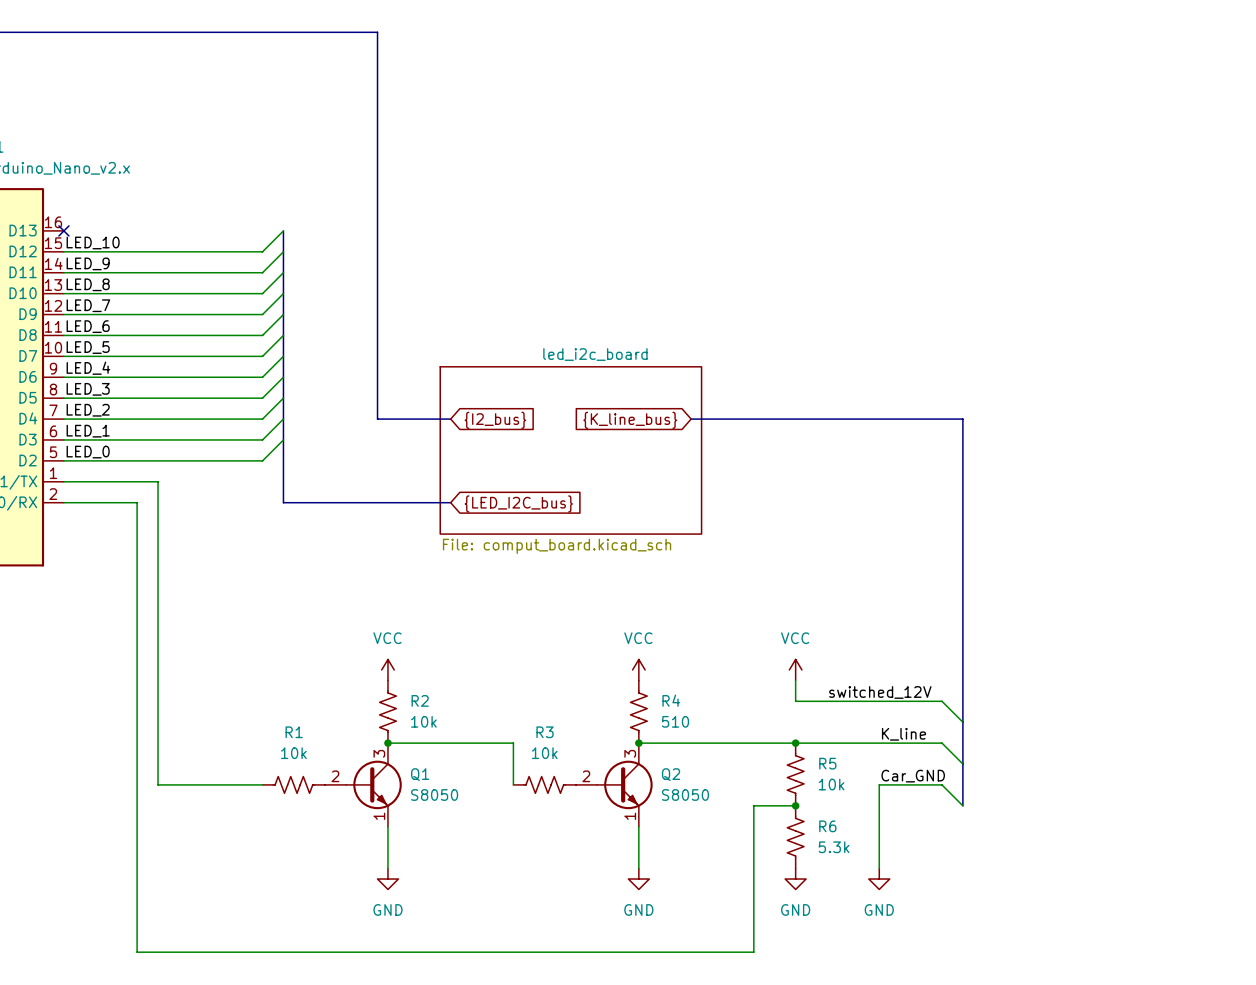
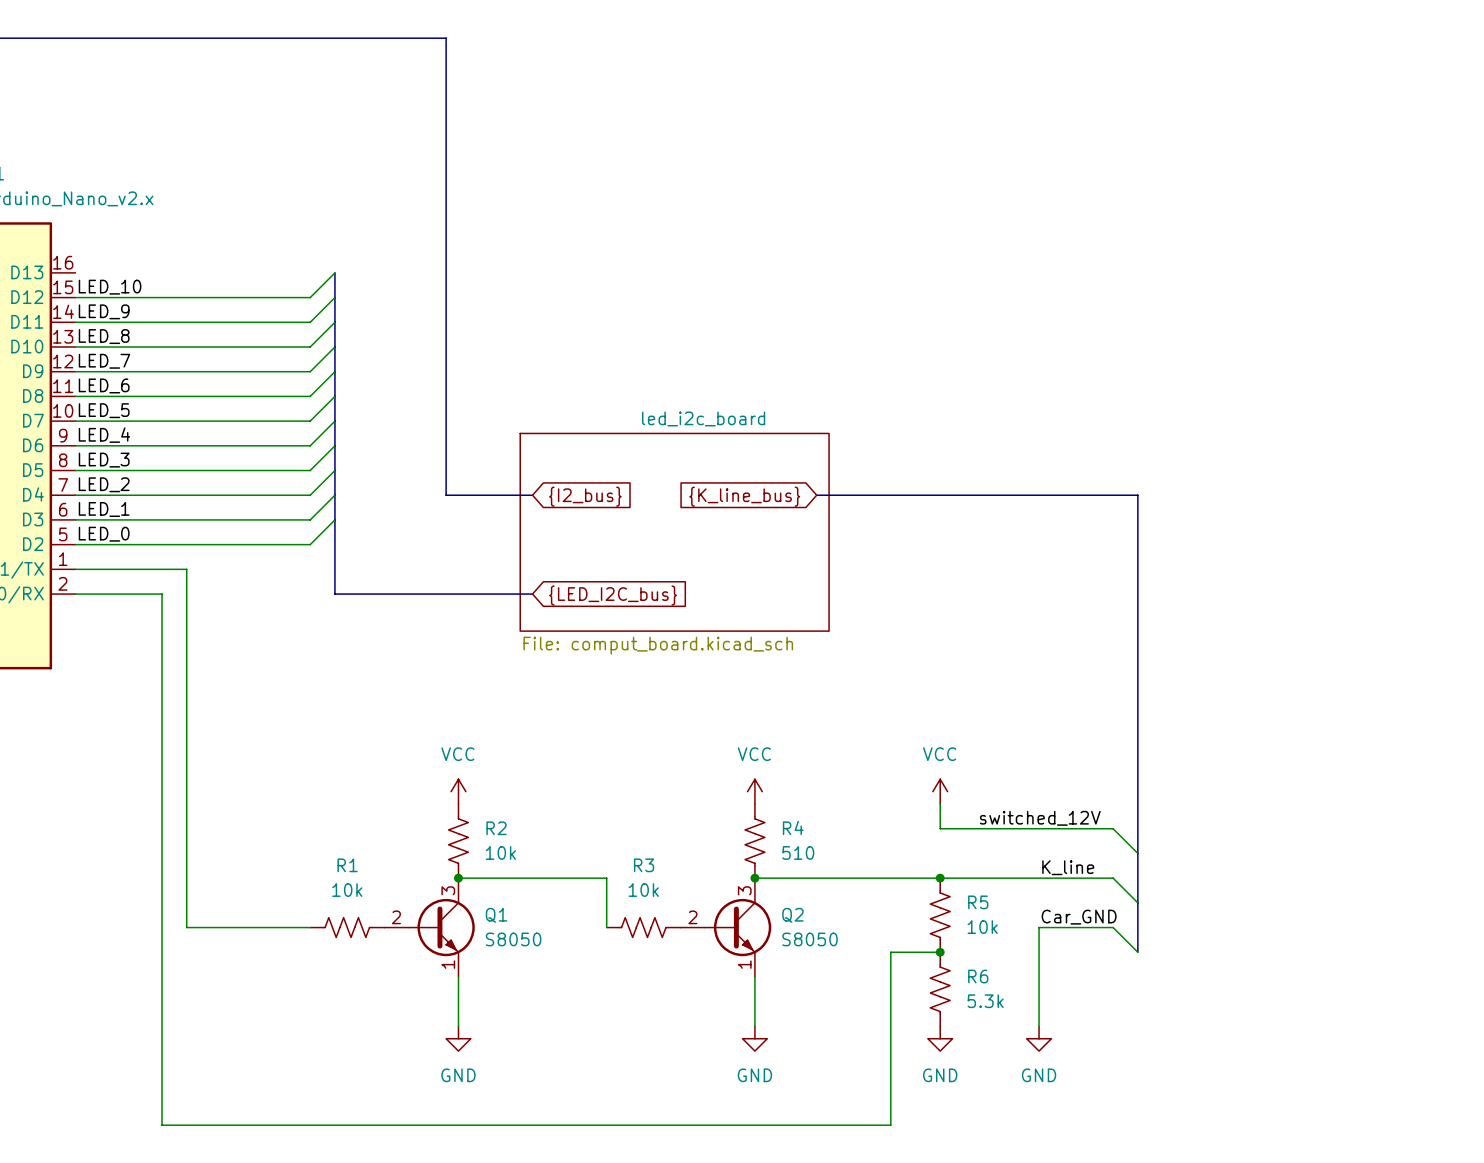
no-connect mark: (63, 230) -> none

